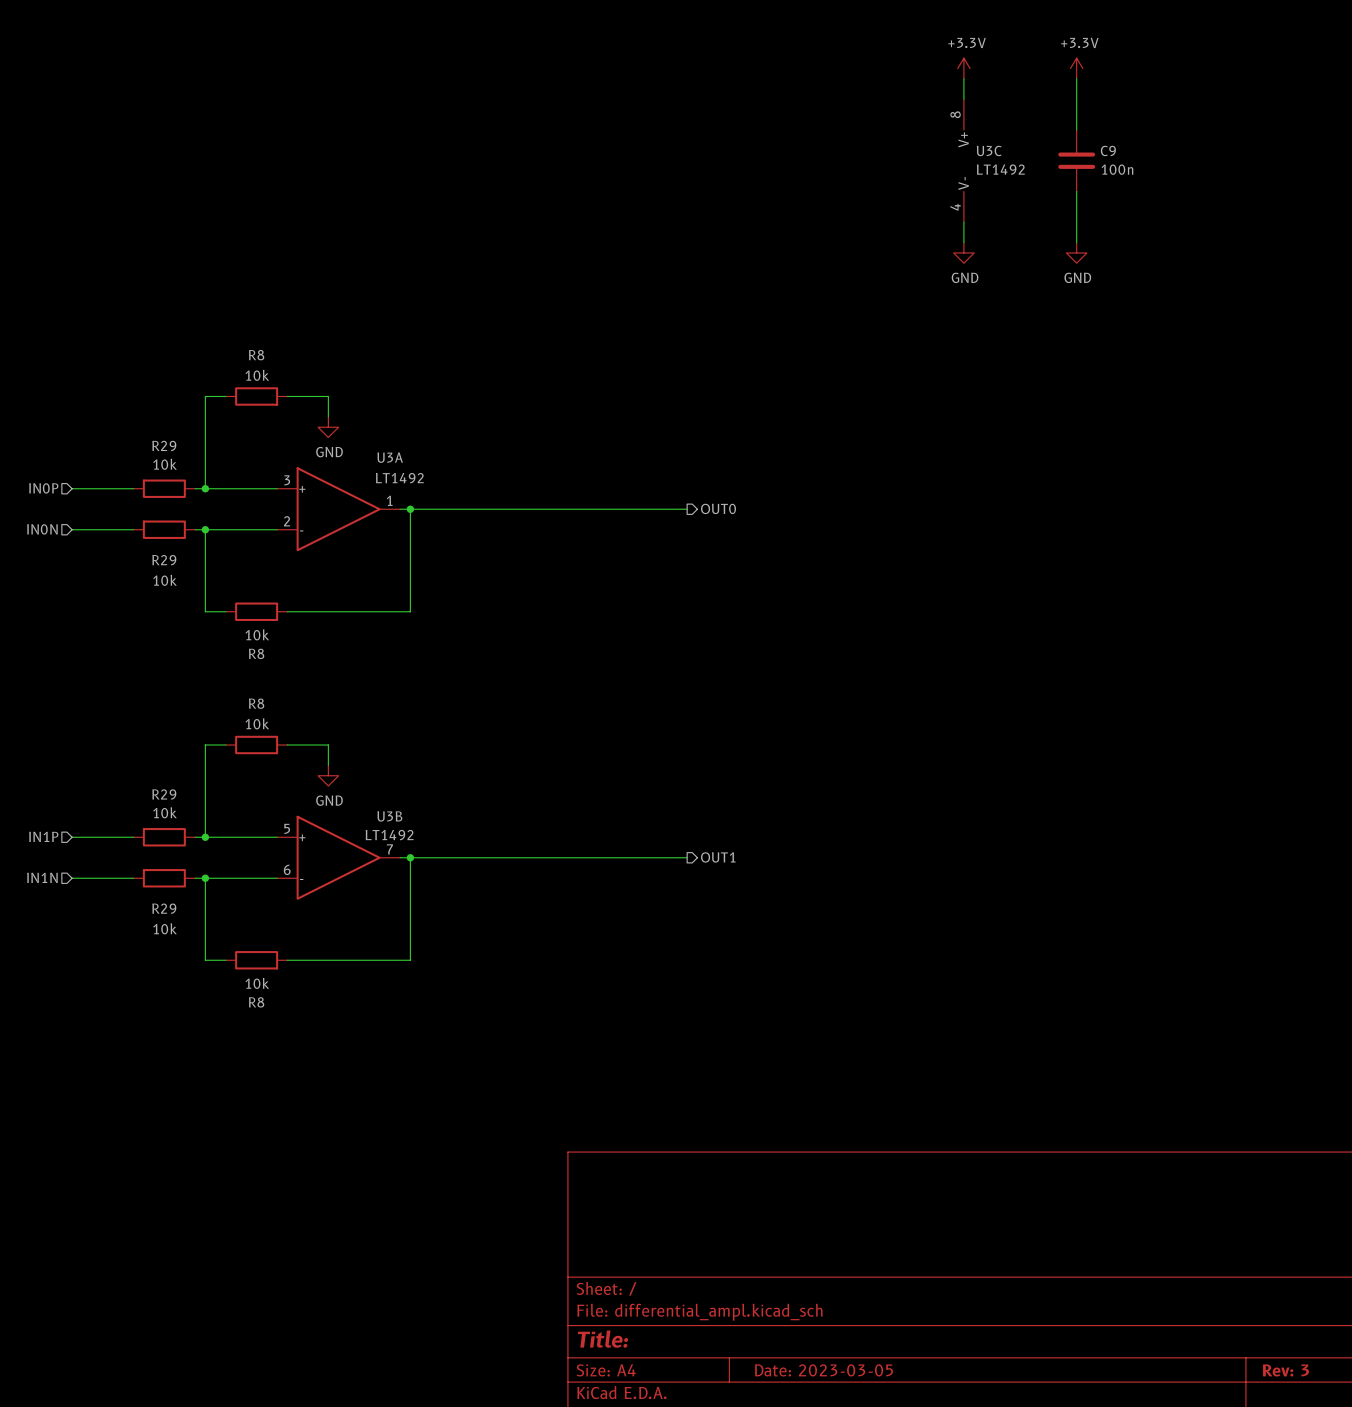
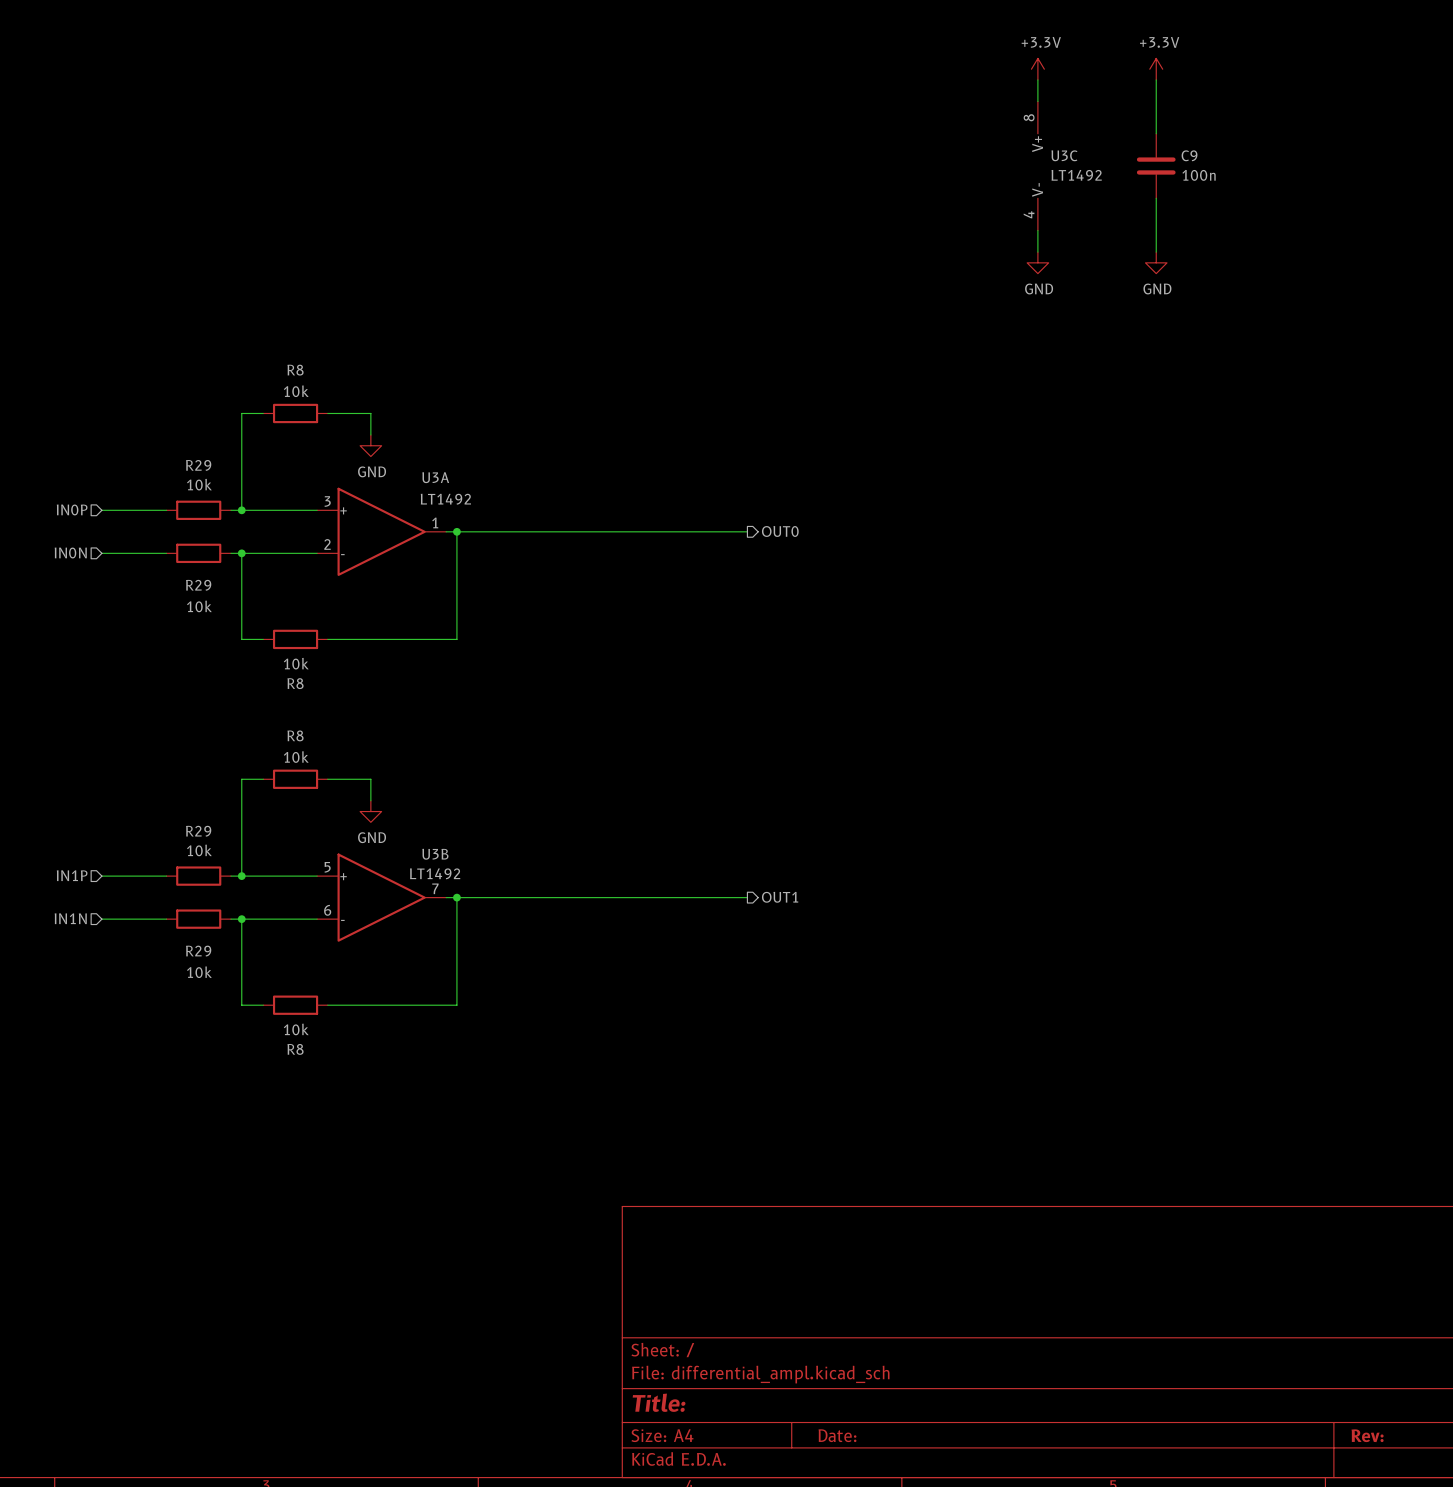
title block: Date: 2023-03-05 (823, 1370) -> Date: (837, 1435)
title block: Rev: 3 (1285, 1370) -> Rev: (1367, 1435)

